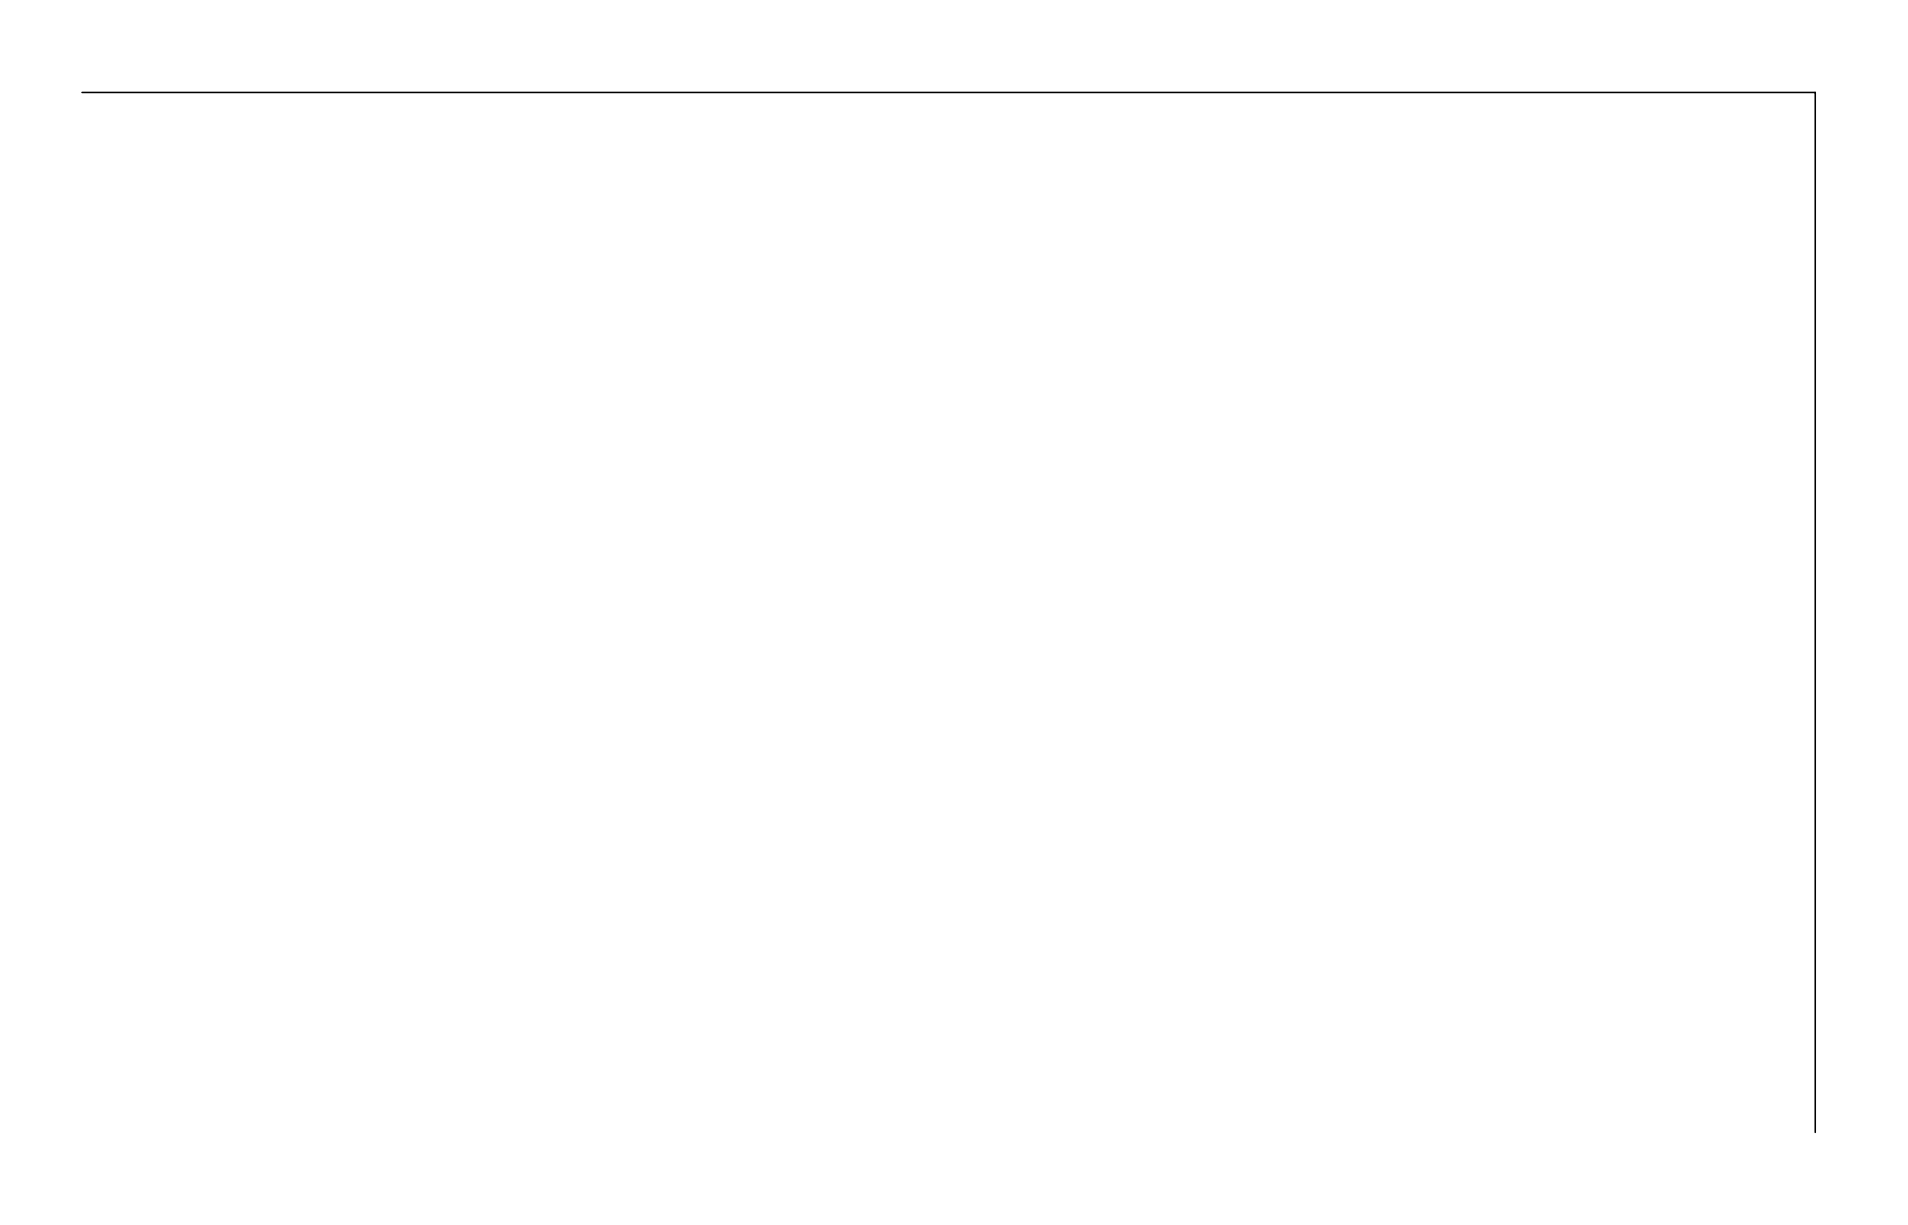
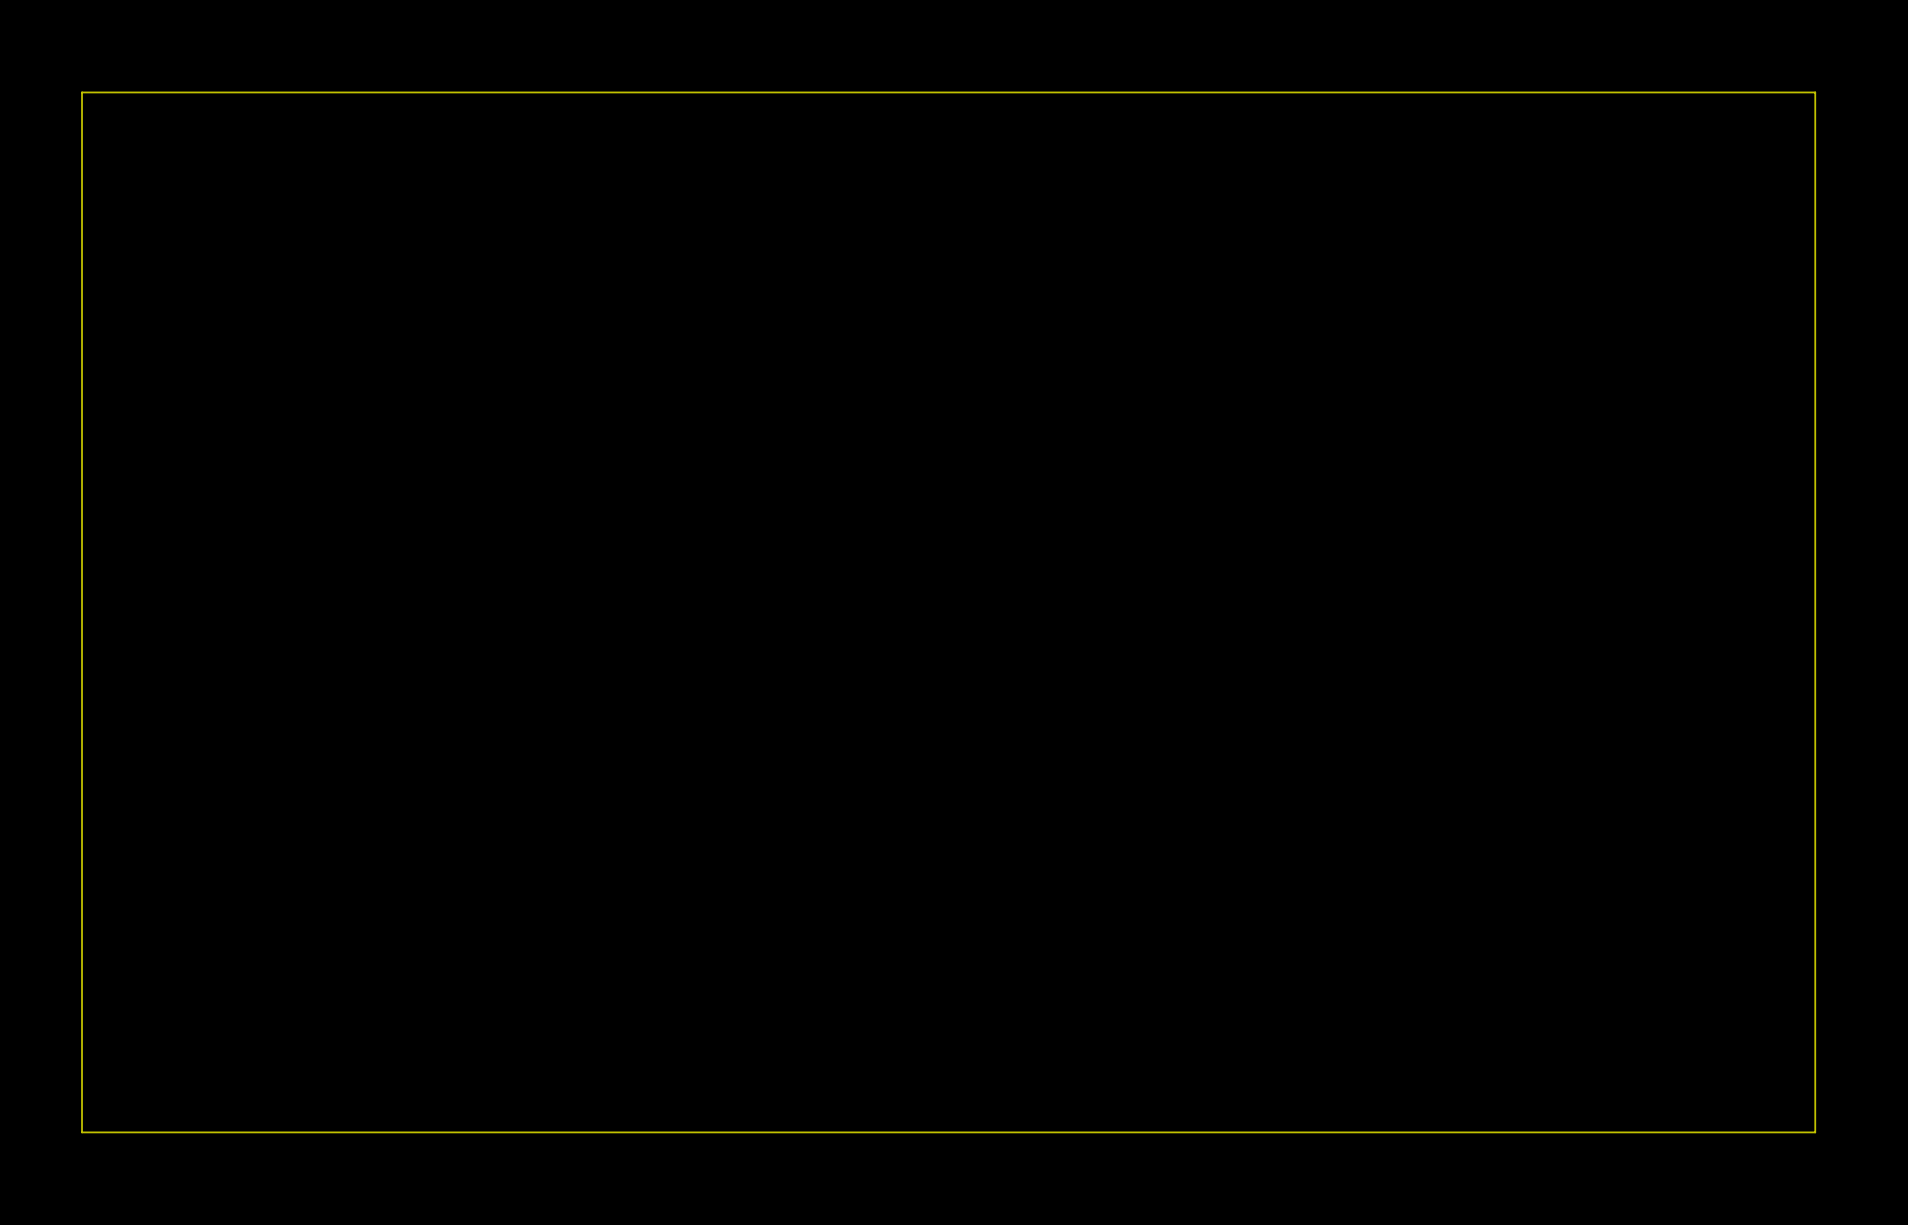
board edge: none -> (82, 92) (82, 1132) (1815, 1132)

